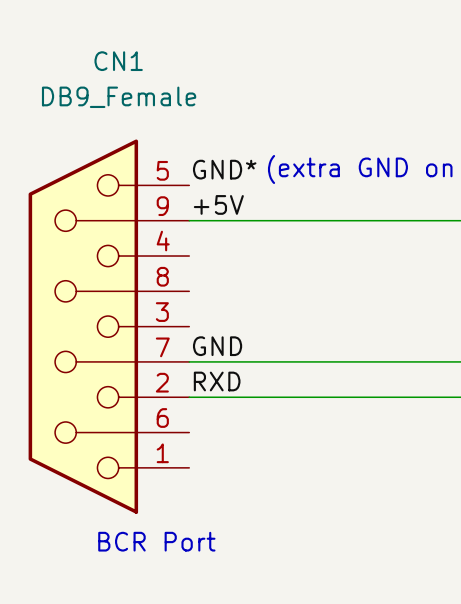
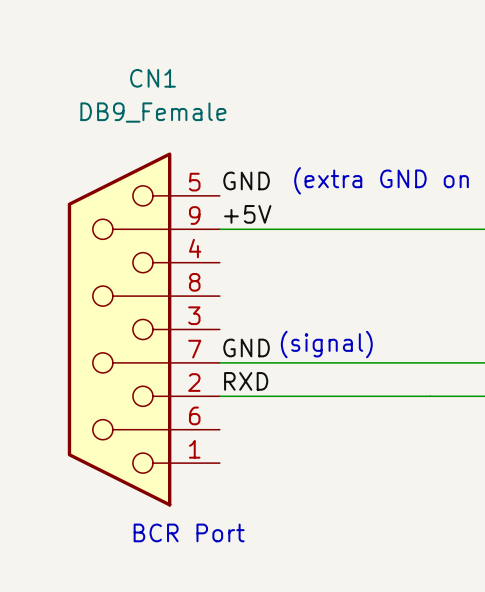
label: GND* (224, 169) -> GND (246, 180)
text: none -> (signal) (326, 344)

